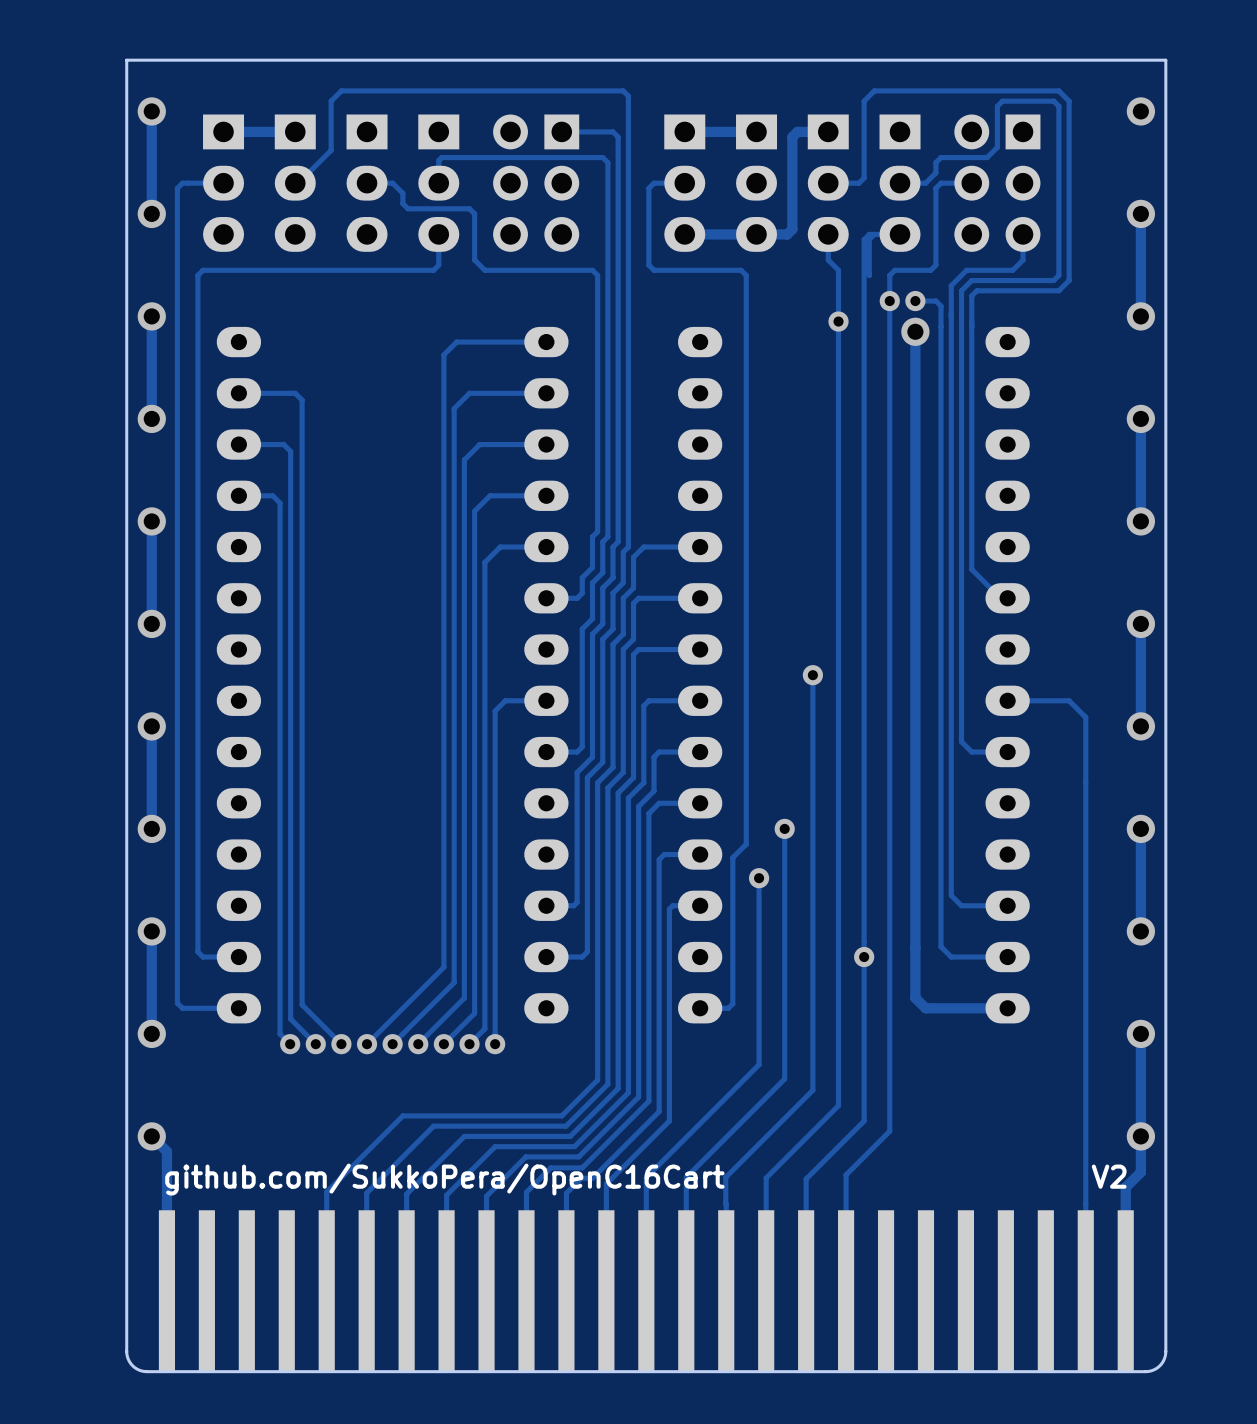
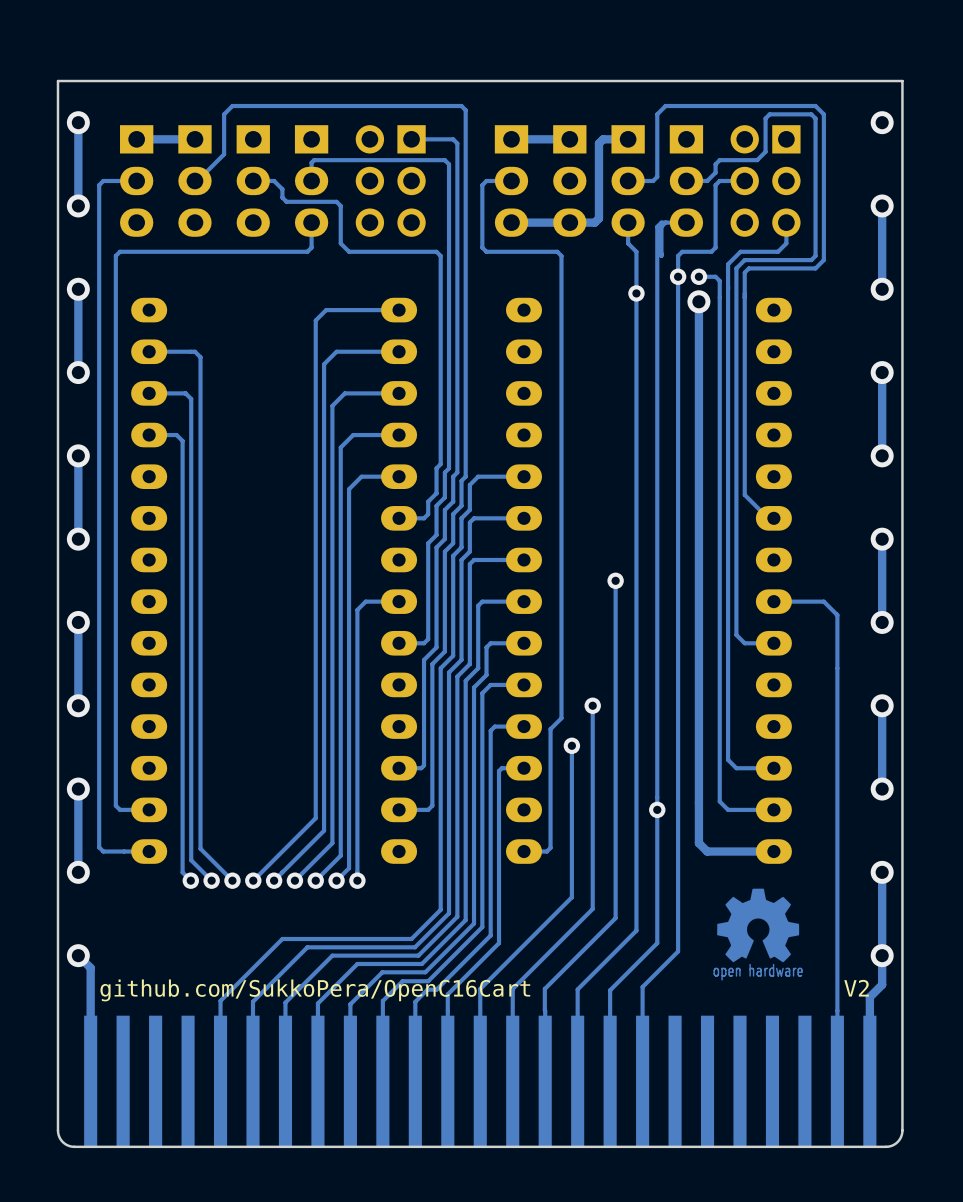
drawing: none -> [713, 888, 803, 981]

